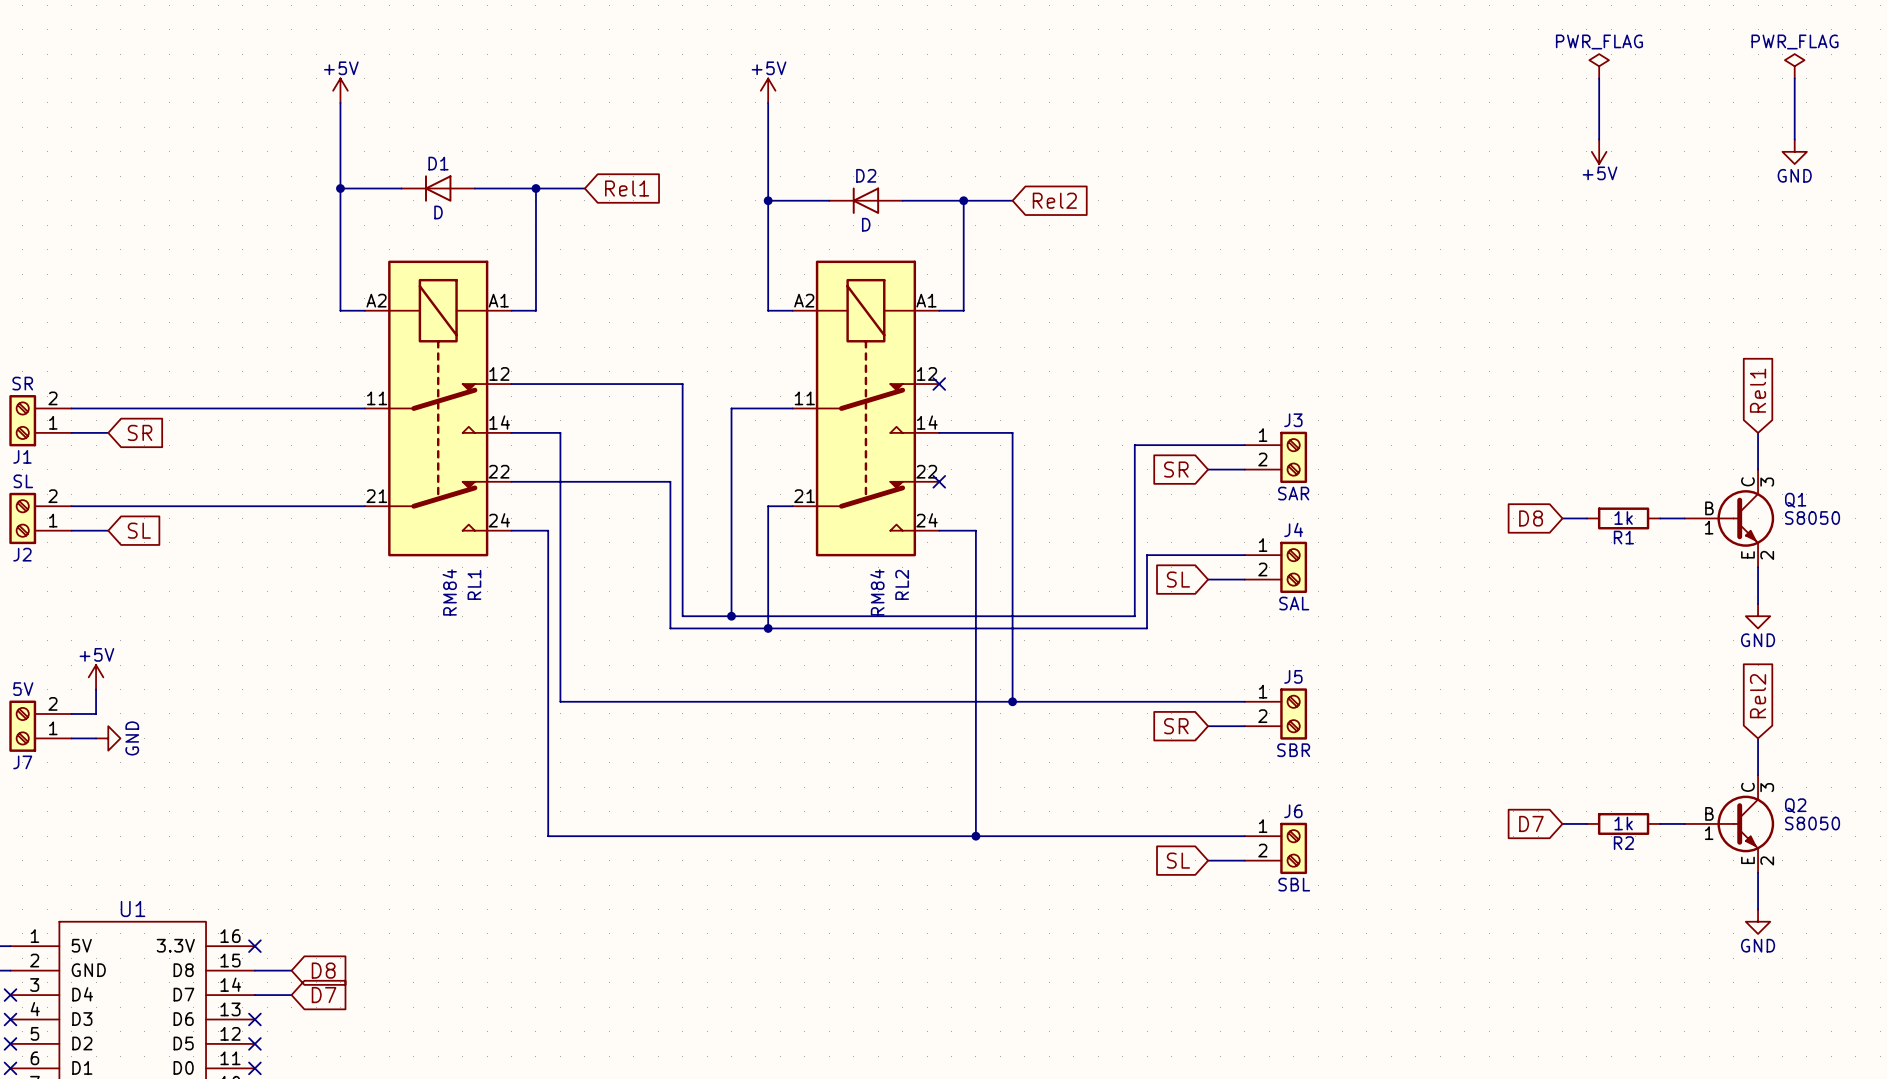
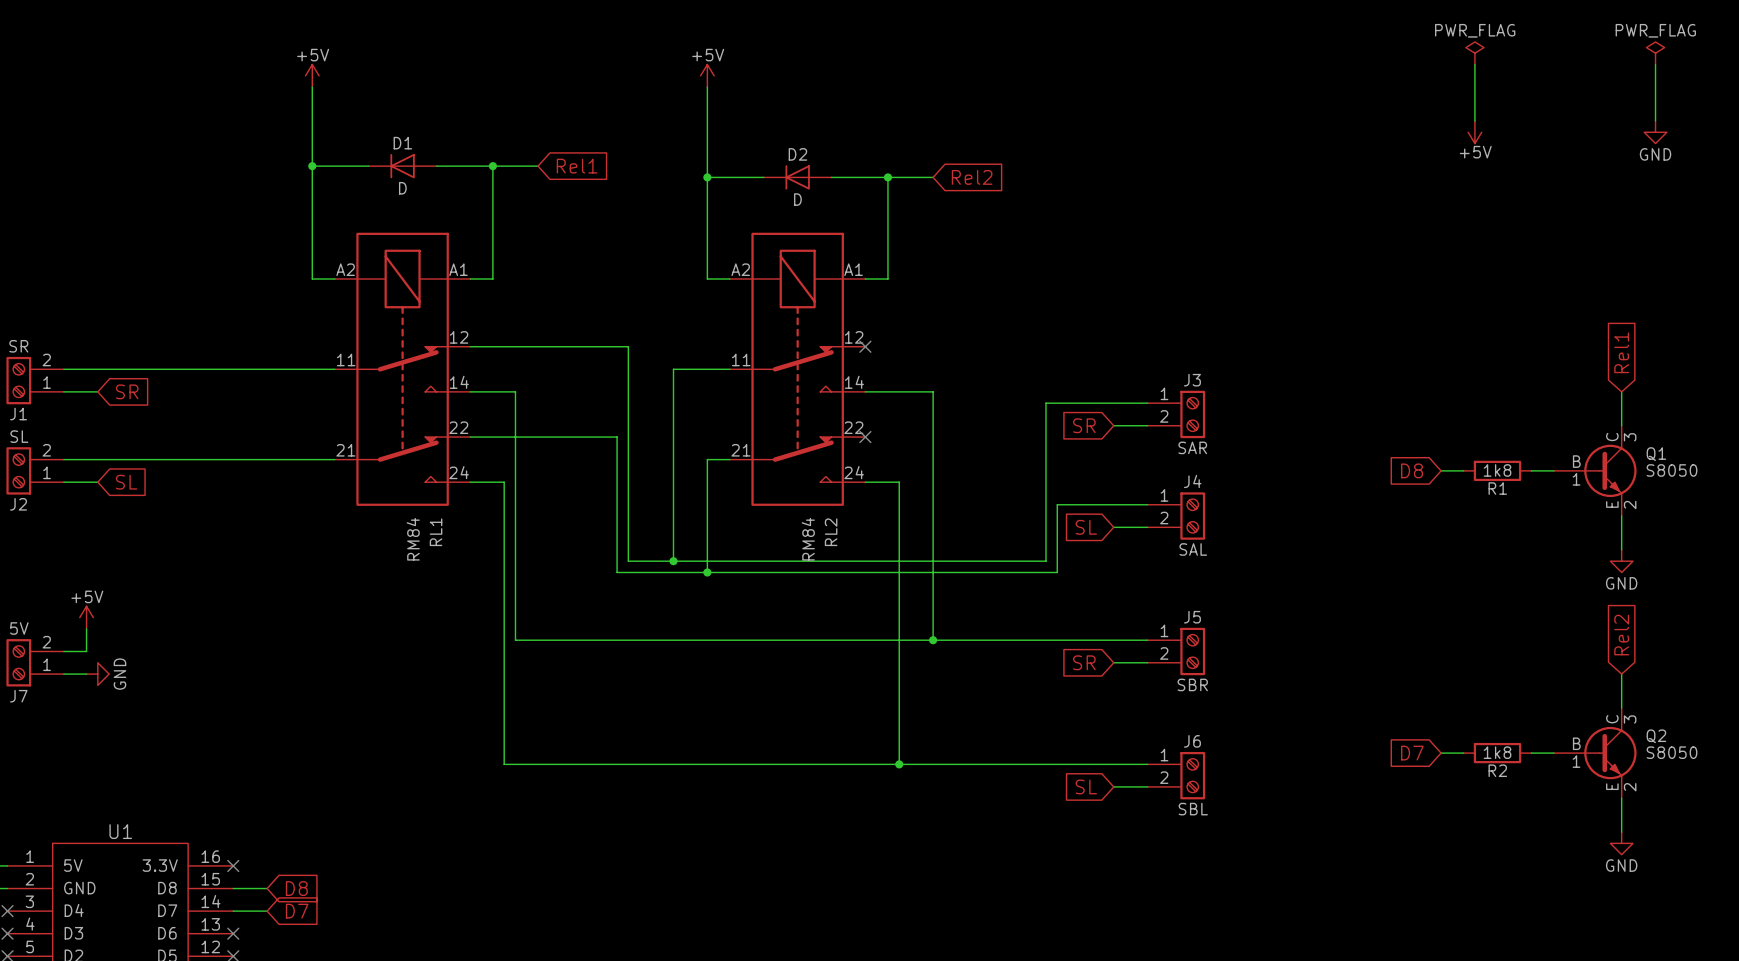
R1 value: 1k (1623, 518) -> 1k8 (1497, 470)
R2 value: 1k (1623, 823) -> 1k8 (1497, 752)

